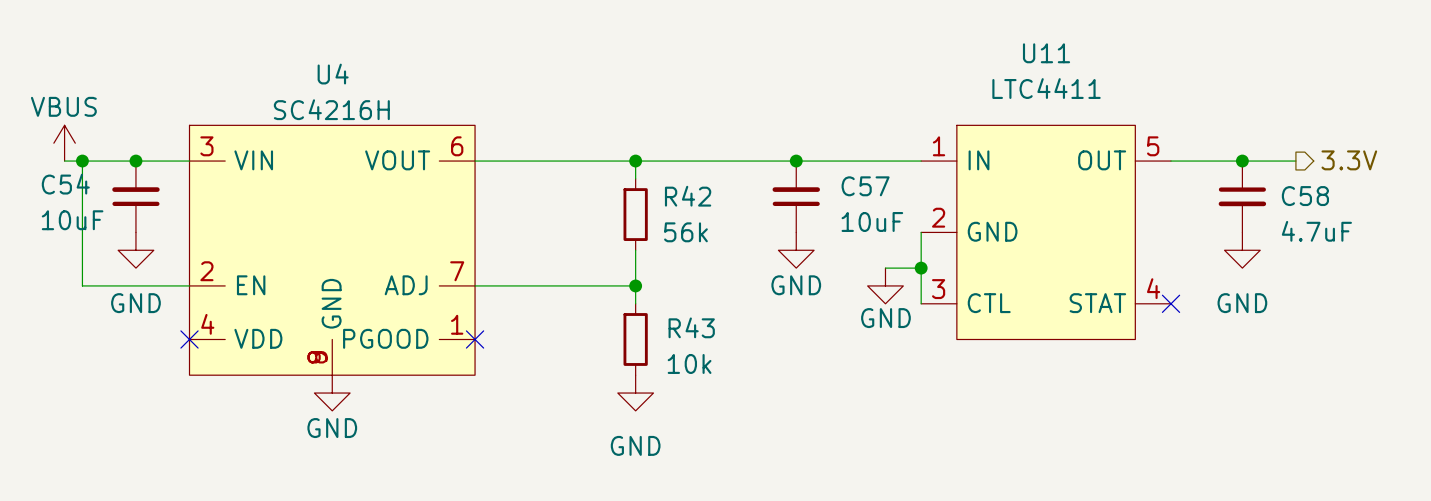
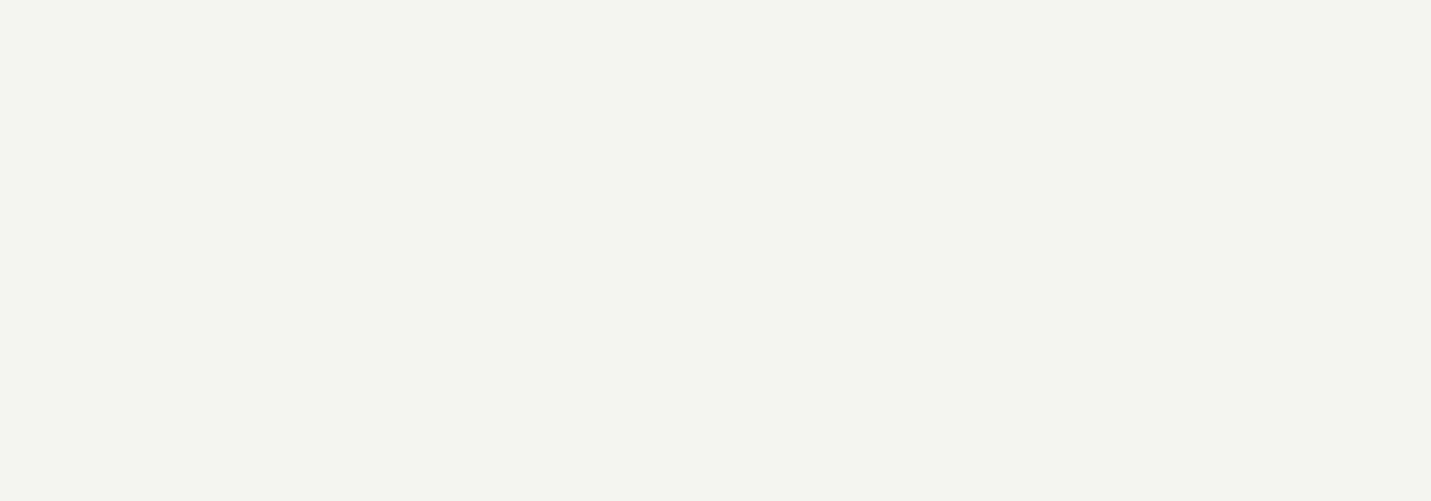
power symbol: VBUS (64, 143) -> none
hierarchical label: 3.3V (1349, 160) -> none
wire: (64, 161) (189, 161) -> none
wire: (82, 161) (82, 285) (189, 285) -> none
junction: (82, 161) -> none
junction: (135, 161) -> none
wire: (475, 161) (921, 161) -> none
wire: (635, 161) (635, 178) -> none
junction: (635, 161) -> none
junction: (796, 161) -> none
wire: (1171, 161) (1295, 161) -> none
junction: (1242, 161) -> none
C54: 10uF (135, 196) -> none
C57: 10uF (796, 196) -> none
C58: 4.7uF (1242, 196) -> none
R42: 56k (635, 214) -> none
wire: (921, 232) (921, 303) -> none
U11: LTC4411 (1046, 232) -> none
power symbol: GND (135, 250) -> none
U4: SC4216H (332, 250) -> none
wire: (635, 250) (635, 303) -> none
power symbol: GND (796, 250) -> none
power symbol: GND (1242, 250) -> none
wire: (885, 268) (921, 268) -> none
junction: (921, 268) -> none
wire: (475, 285) (635, 285) -> none
junction: (635, 285) -> none
power symbol: GND (885, 285) -> none
no-connect mark: (1171, 303) -> none
no-connect mark: (189, 339) -> none
no-connect mark: (475, 339) -> none
R43: 10k (635, 339) -> none
power symbol: GND (332, 393) -> none
power symbol: GND (635, 393) -> none

